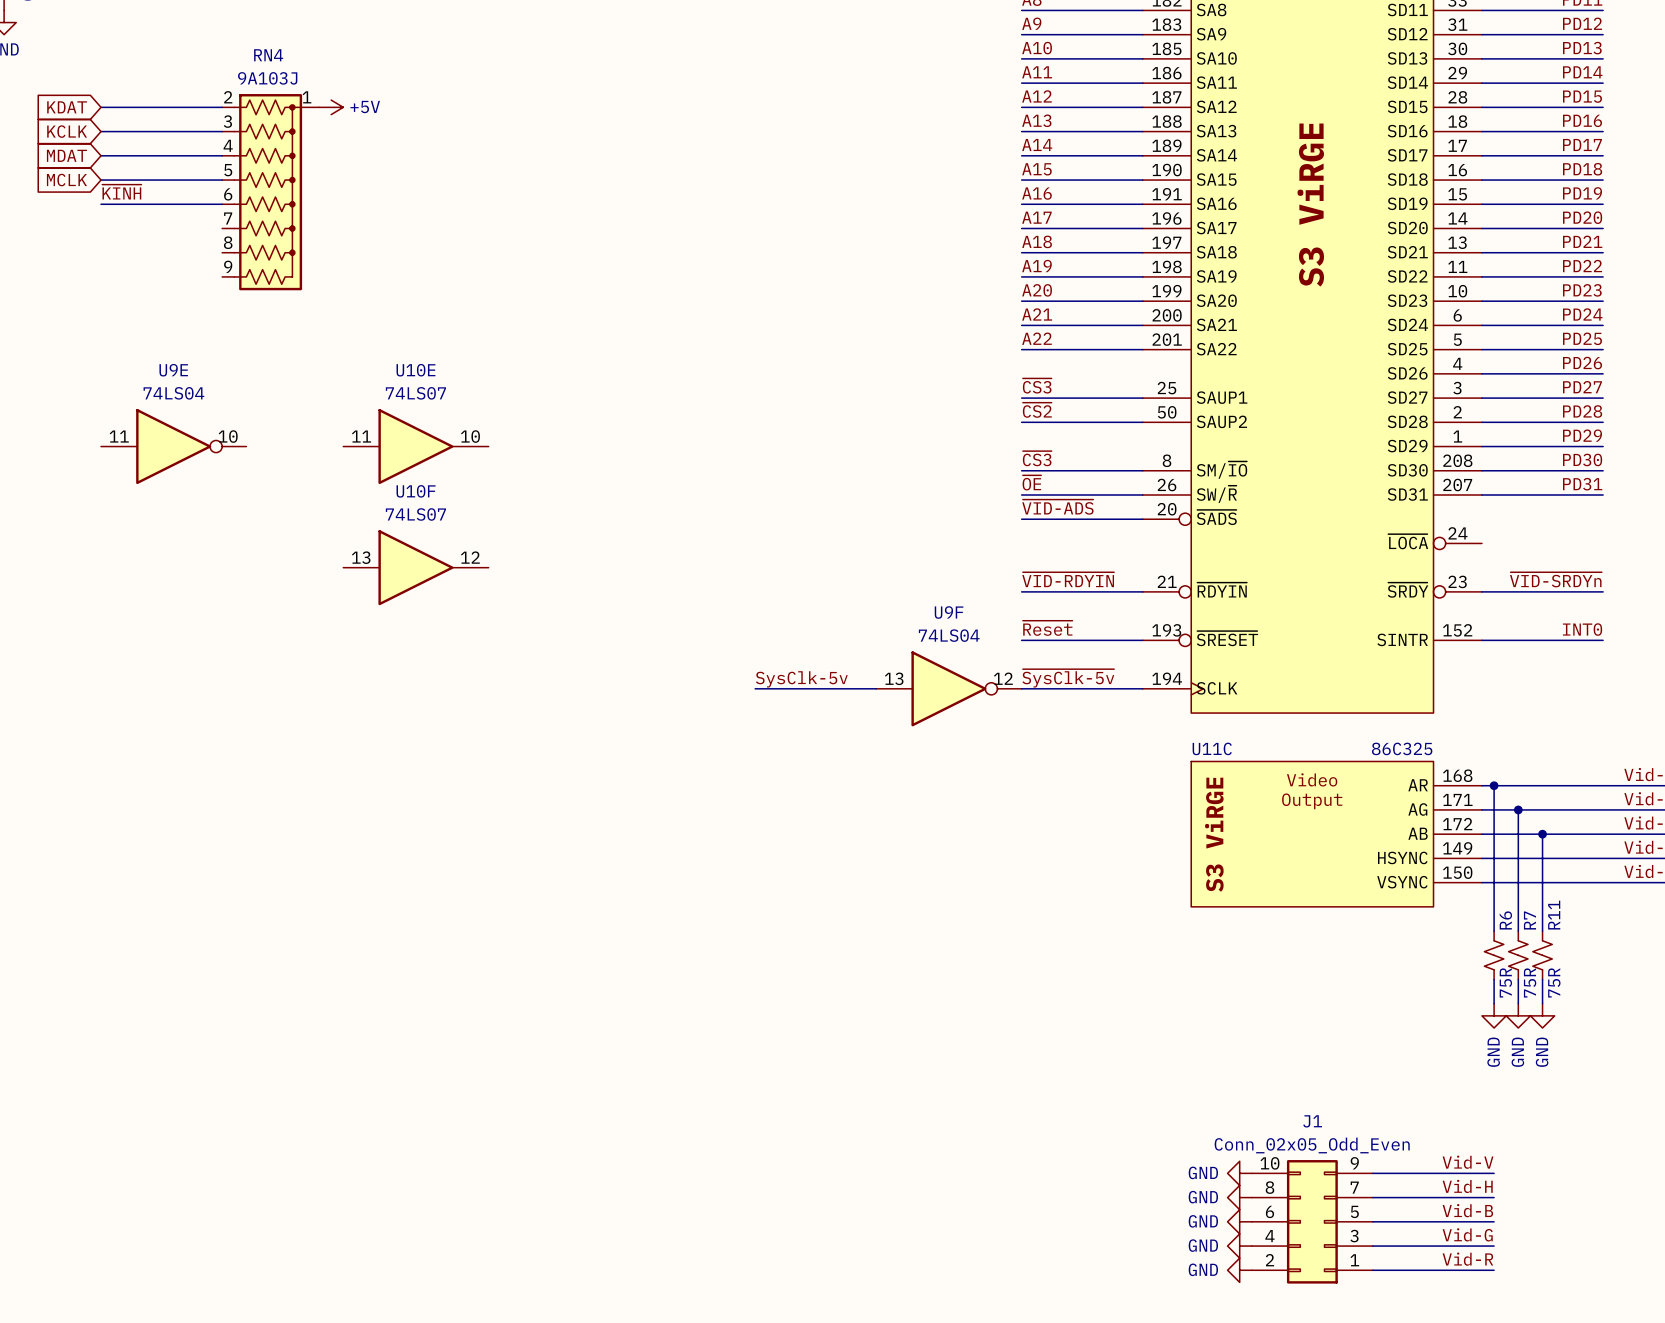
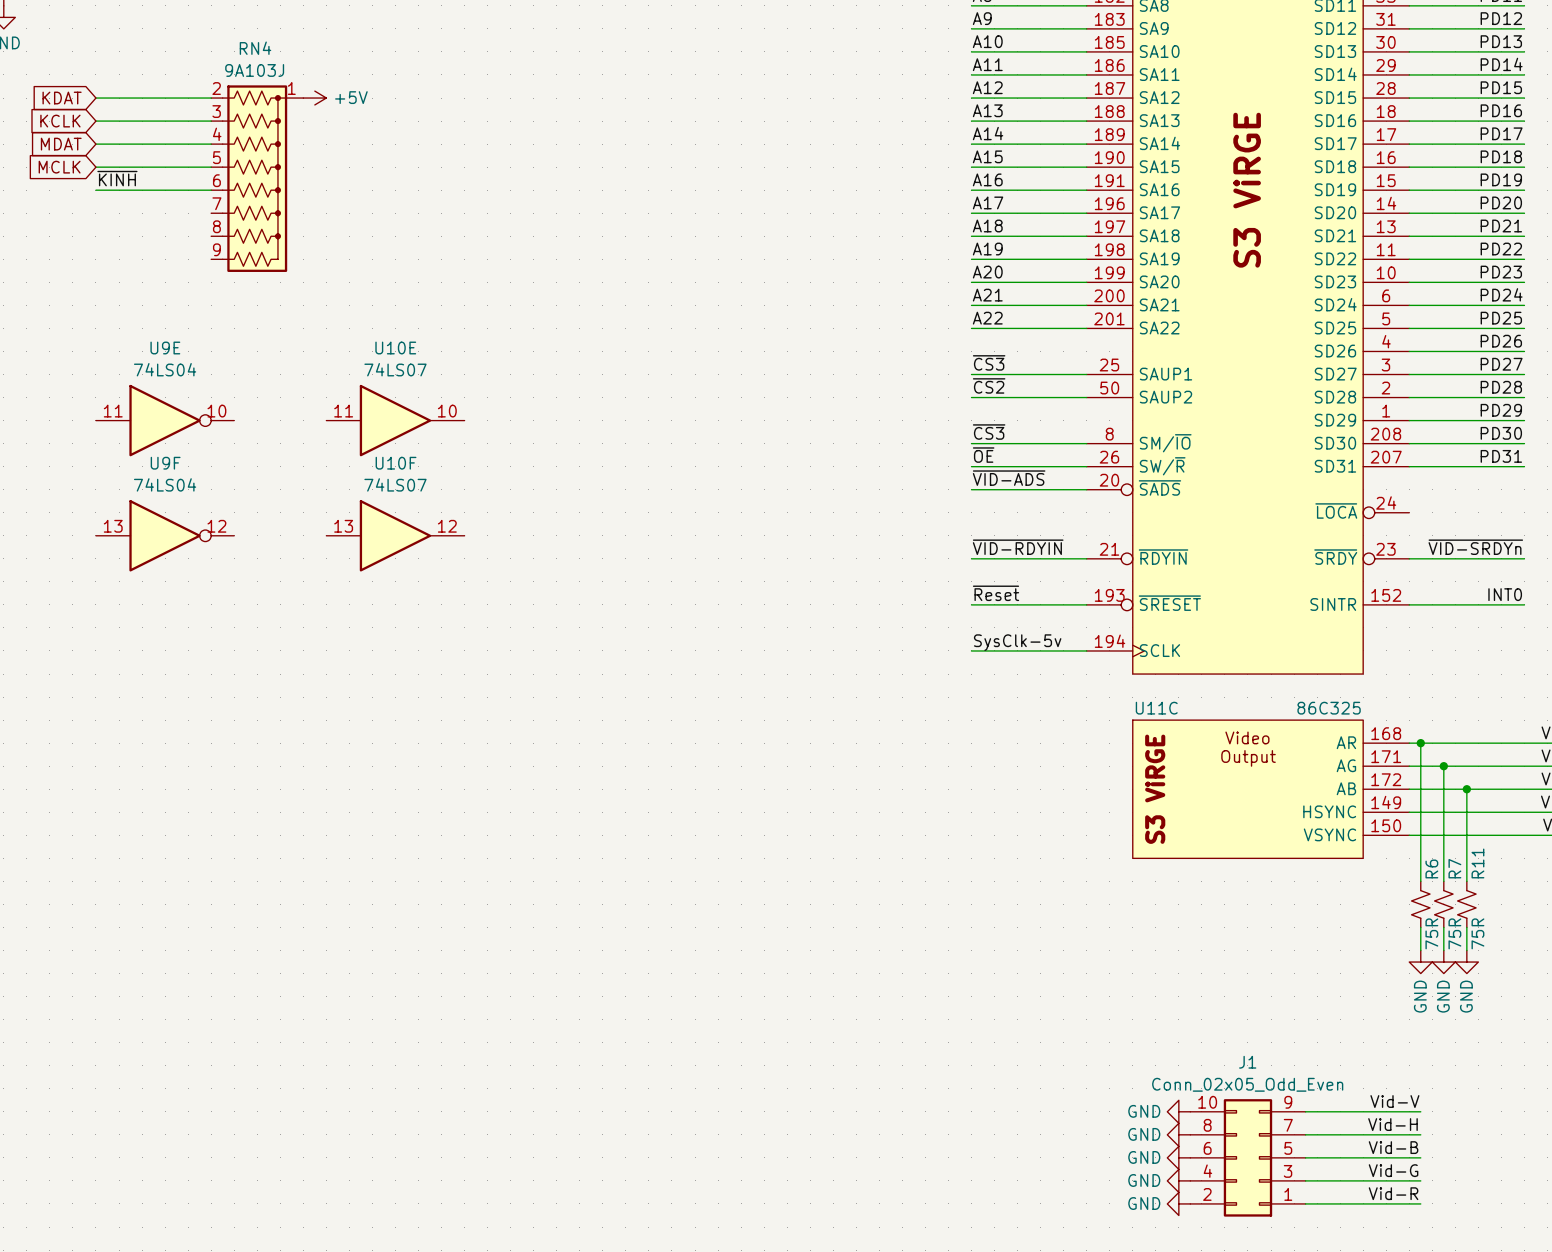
label: ~{SysClk-5v} (1068, 678) -> SysClk-5v (1017, 642)
label: SysClk-5v (801, 679) -> none
wire: (755, 688) (876, 688) -> none
U9F position: (948, 688) -> (165, 535)

